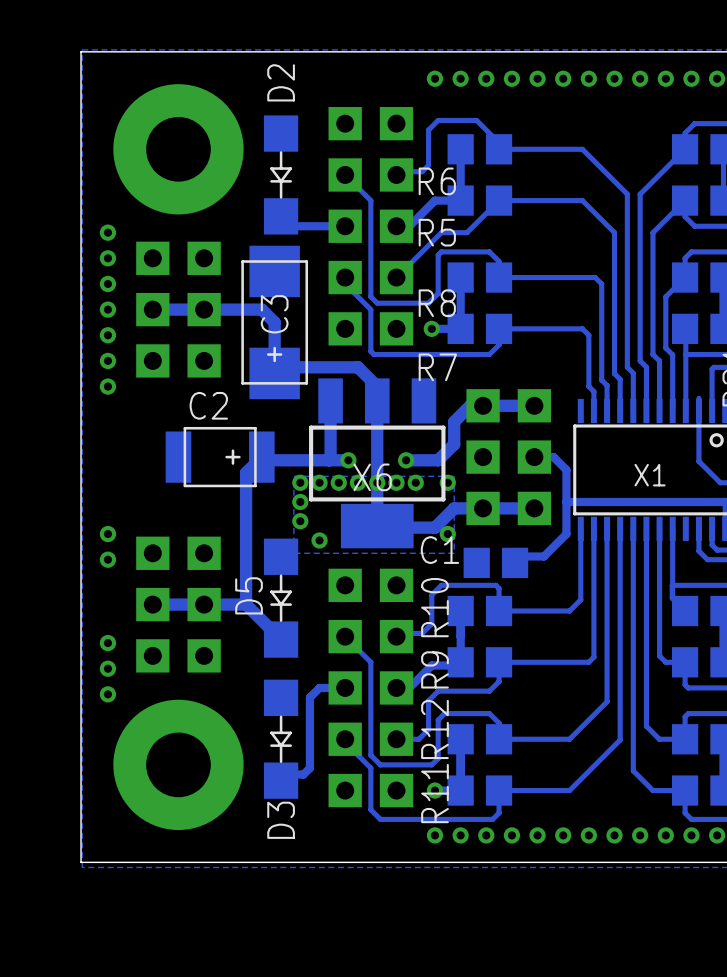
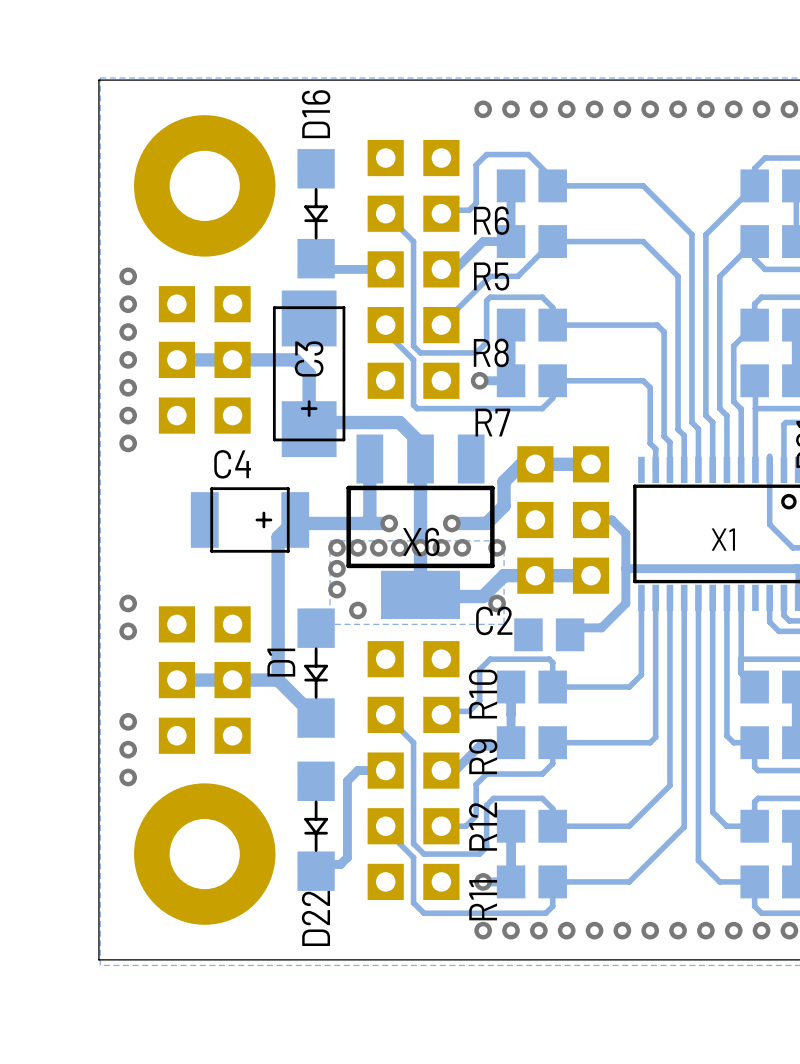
D2 name: D2 (281, 82) -> D16 (316, 114)
C2 name: C2 (208, 405) -> C4 (232, 464)
C1 name: C1 (439, 550) -> C2 (494, 620)
D5 name: D5 (249, 595) -> D1 (281, 662)
D3 name: D3 (281, 820) -> D22 (315, 918)

